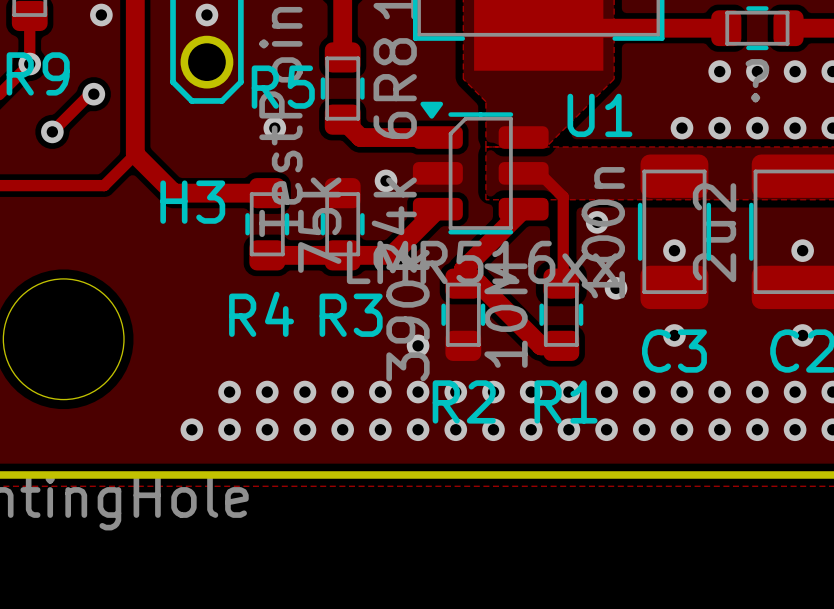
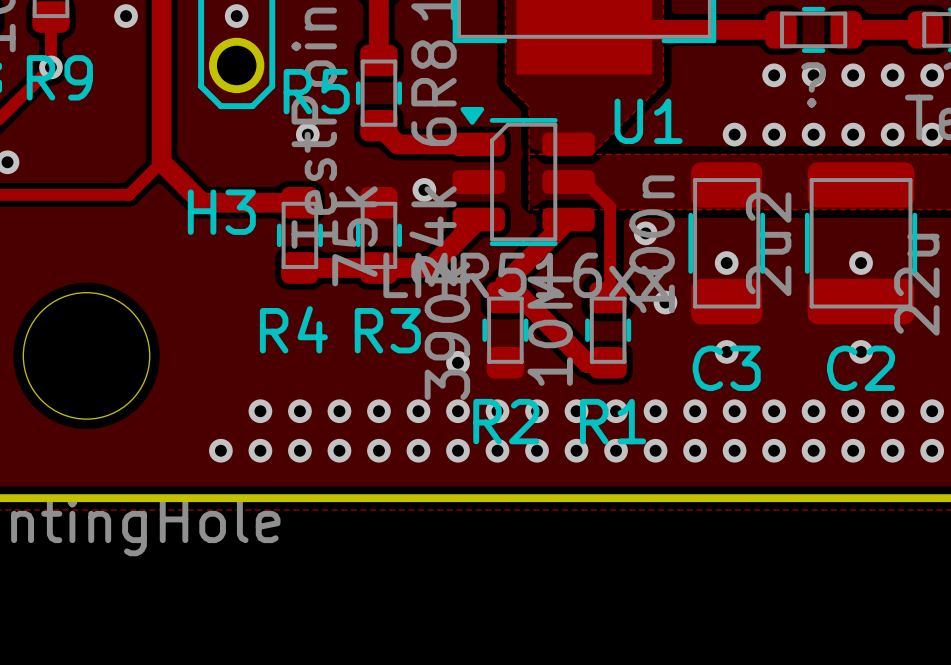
track: (93, 94) (90, 94) (52, 131) -> none
via: (93, 94) -> none
via: (52, 131) -> none

